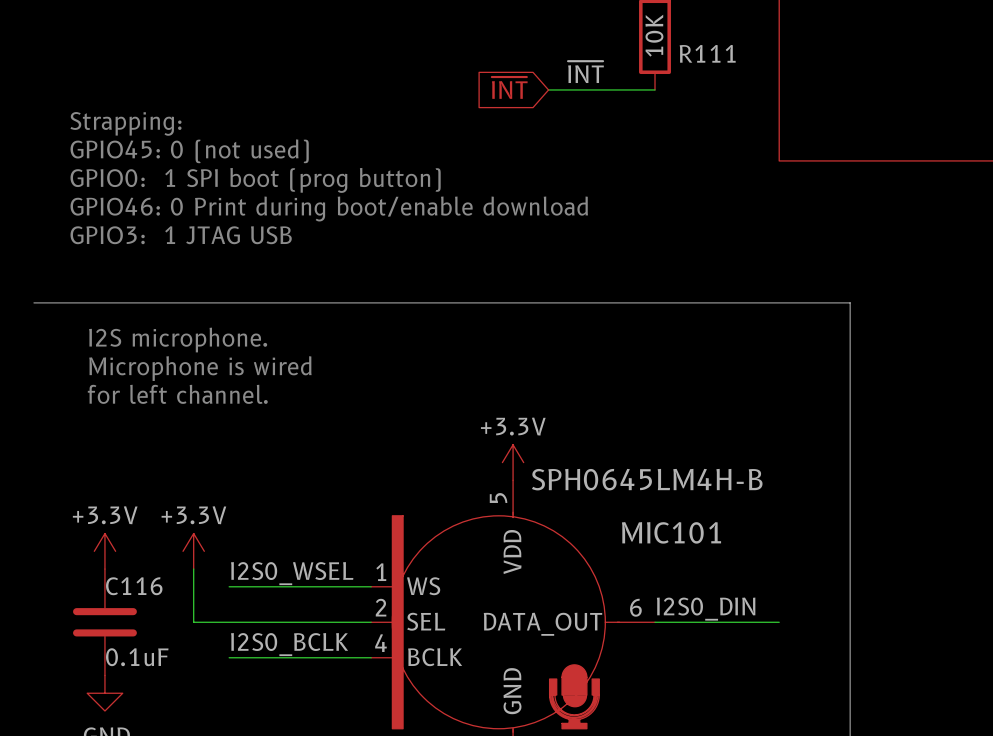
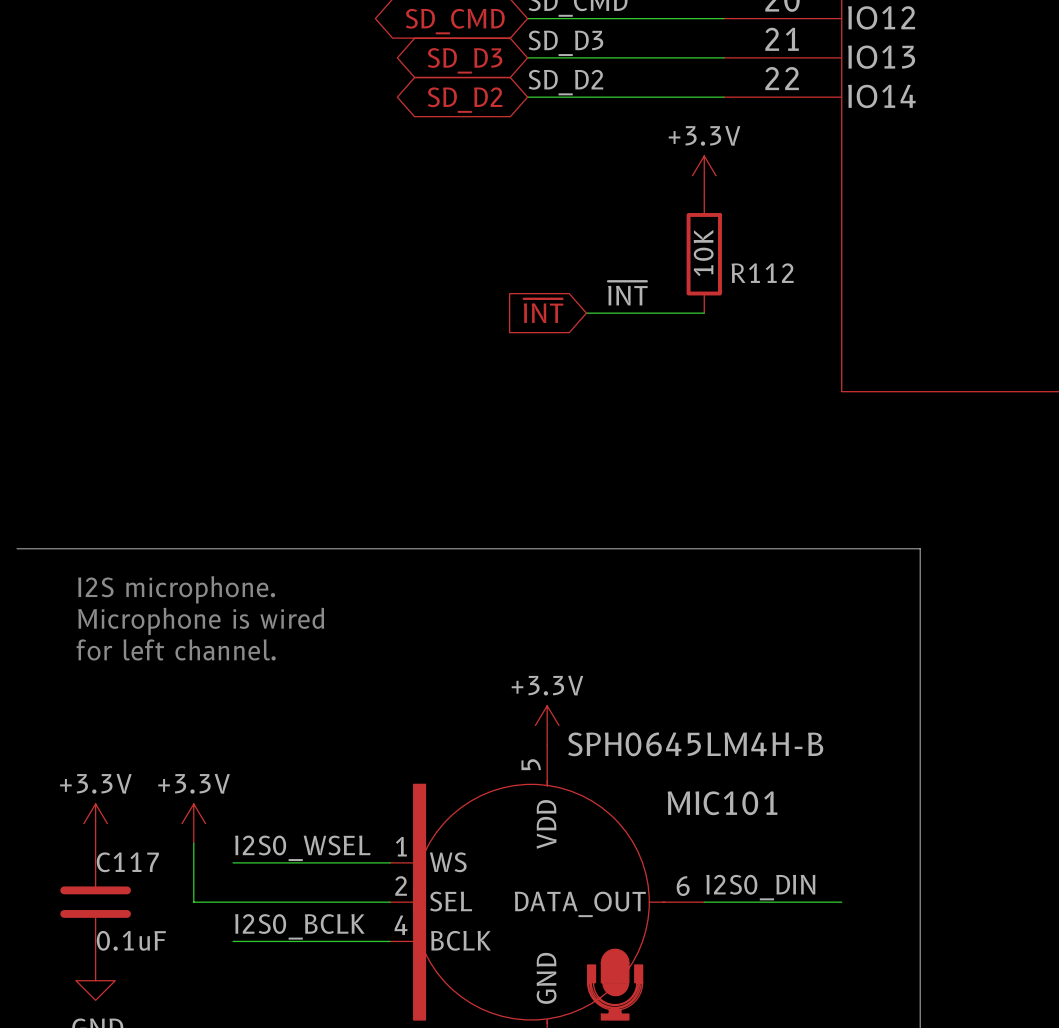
R111 name: R111 (707, 53) -> R112 (762, 273)
text: Strapping: (125, 123) -> none
text: GPIO45: 0 (not used) (189, 151) -> none
text: GPIO0: 1 SPI boot (prog button) (255, 180) -> none
text: GPIO46: 0 Print during boot/enable download (329, 209) -> none
text: GPIO3: 1 JTAG USB (181, 235) -> none
C116 name: C116 (134, 586) -> C117 (127, 862)

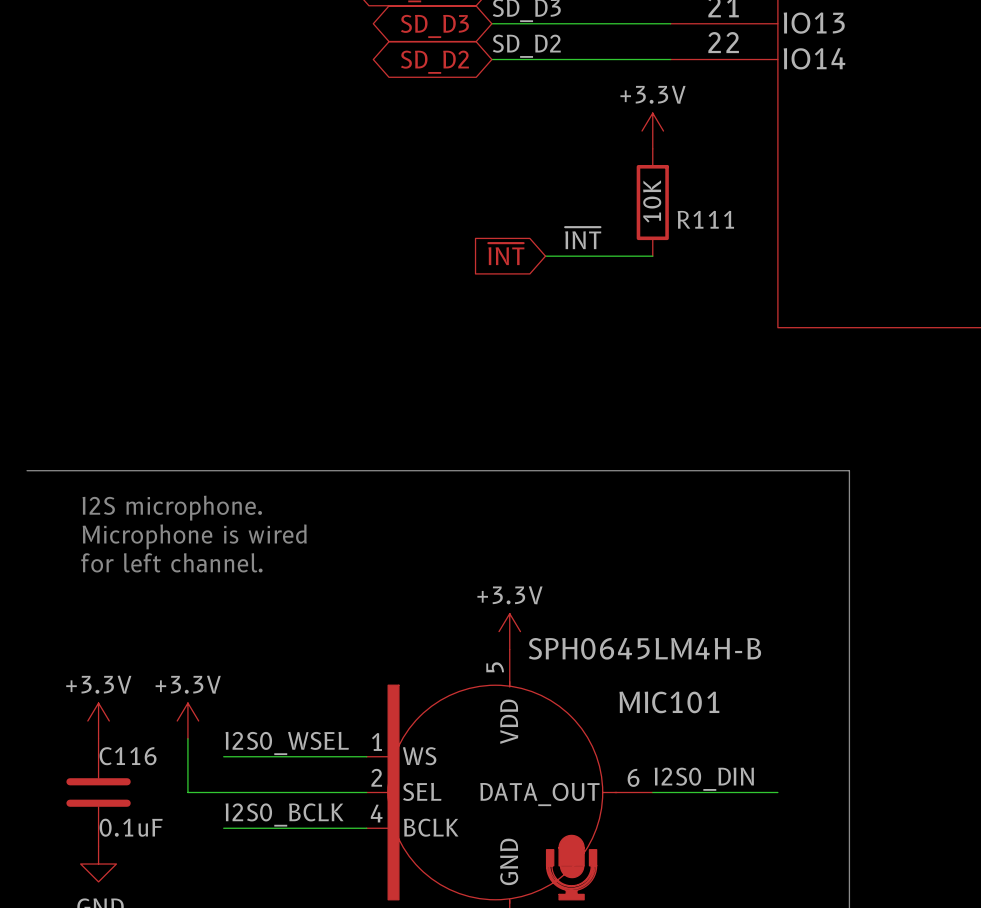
R112 name: R112 (762, 273) -> R111 (705, 219)
C117 name: C117 (127, 862) -> C116 (128, 756)

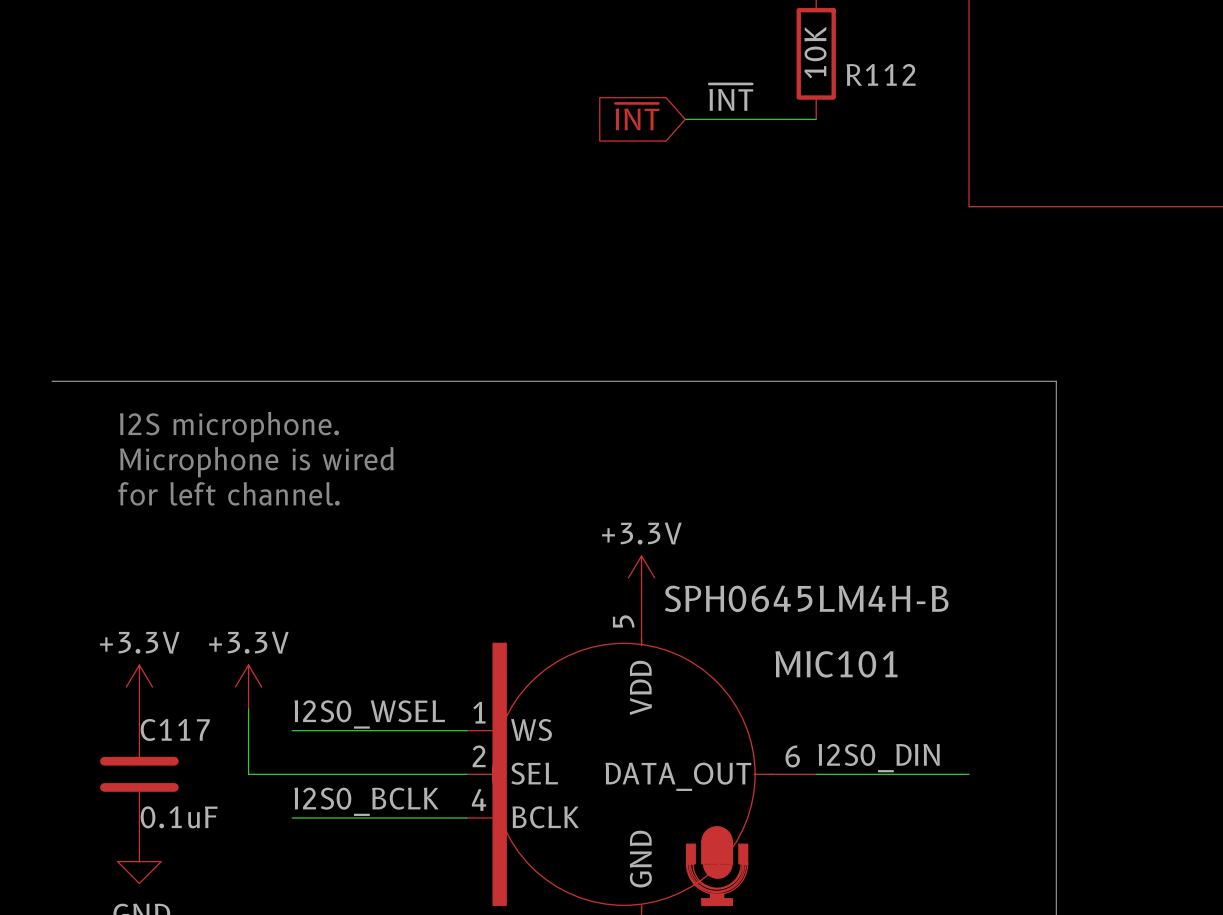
R111 name: R111 (705, 219) -> R112 (881, 74)
C116 name: C116 (128, 756) -> C117 (175, 729)

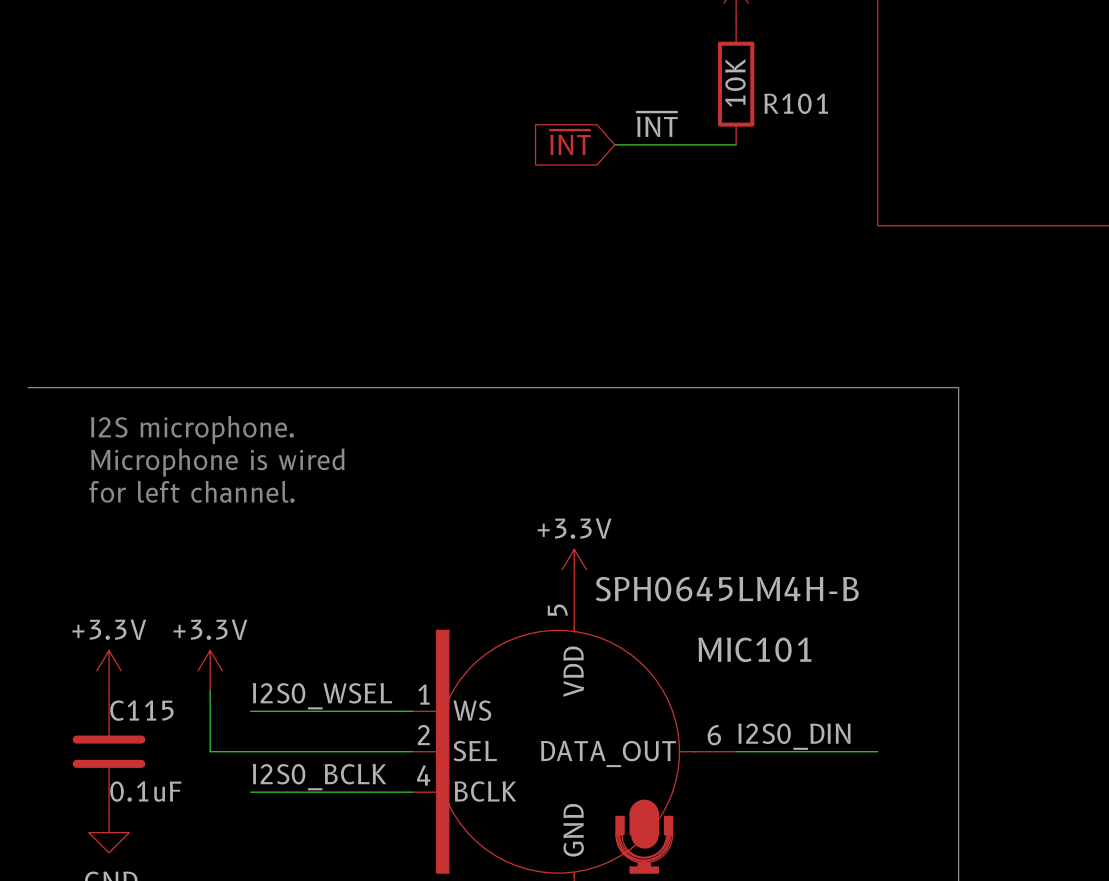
R112 name: R112 (881, 74) -> R101 (796, 103)
C117 name: C117 (175, 729) -> C115 (141, 710)

